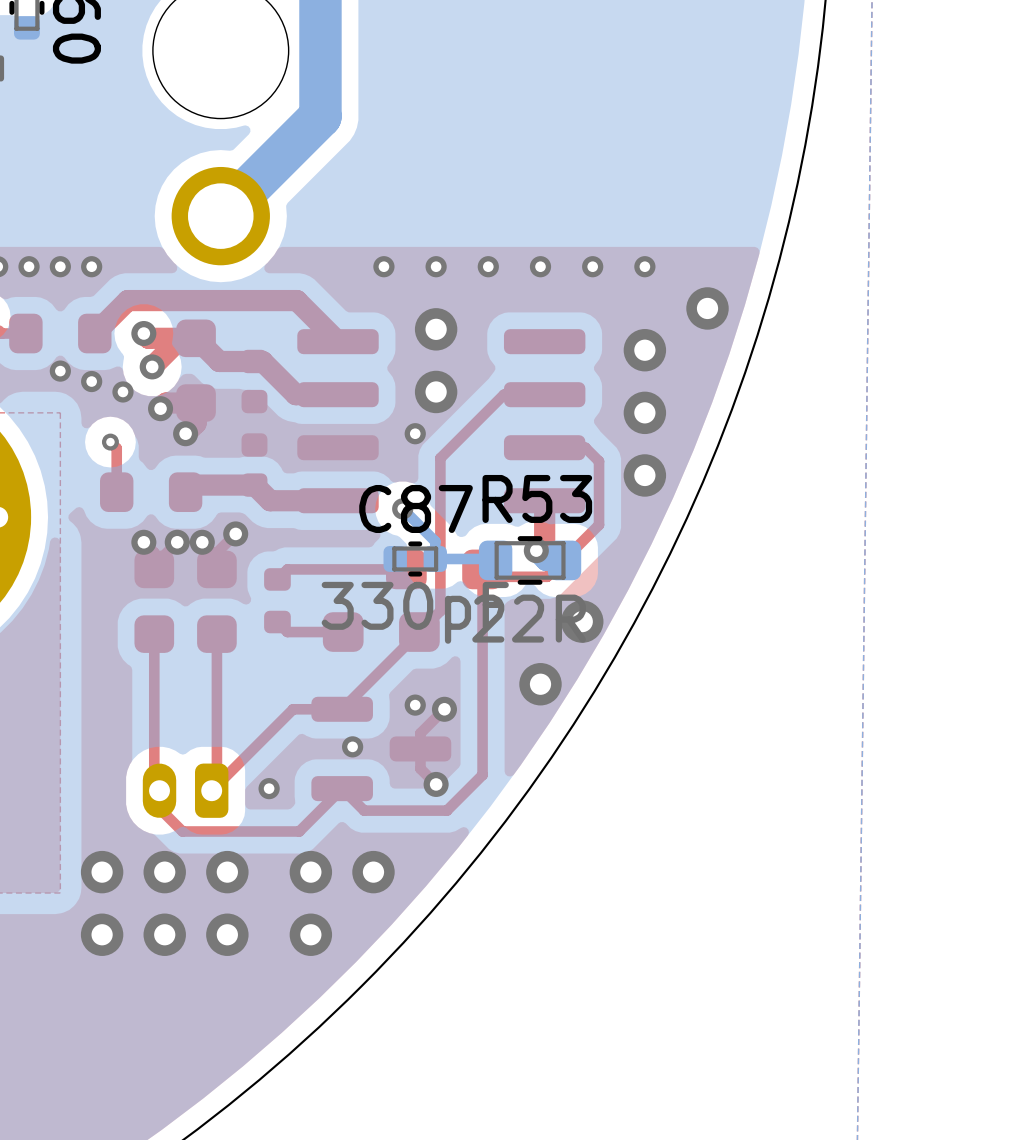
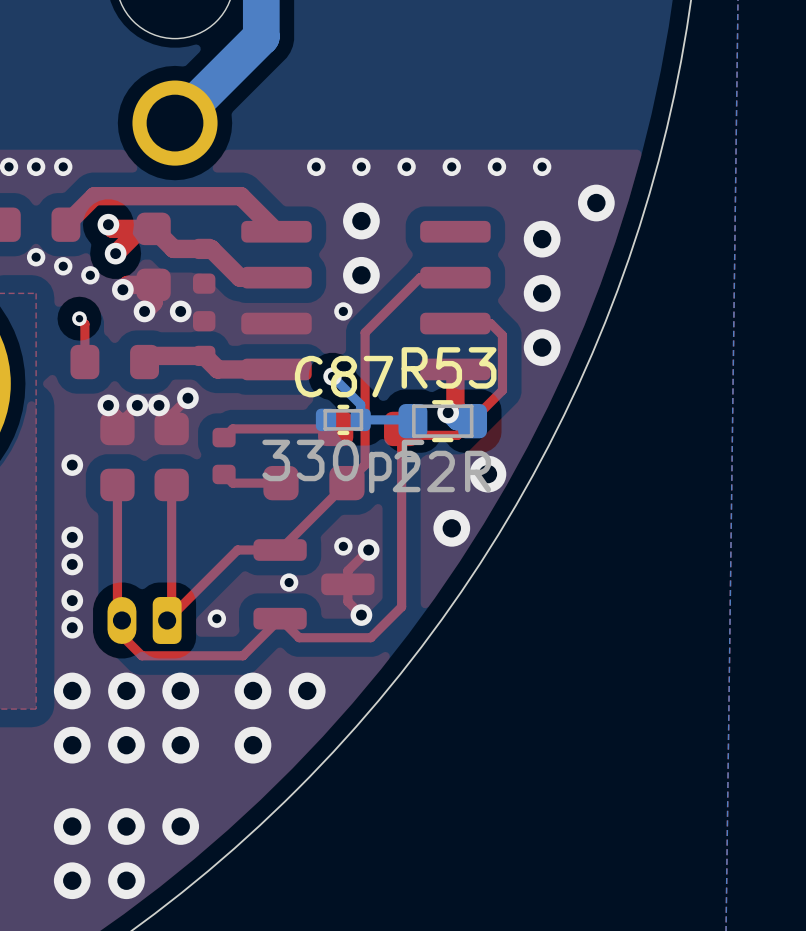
via: none -> (180, 311)
via: none -> (72, 465)
via: none -> (72, 537)
via: none -> (72, 564)
via: none -> (72, 600)
via: none -> (72, 627)
via: none -> (72, 826)
via: none -> (126, 826)
via: none -> (180, 826)
via: none -> (72, 880)
via: none -> (126, 880)

